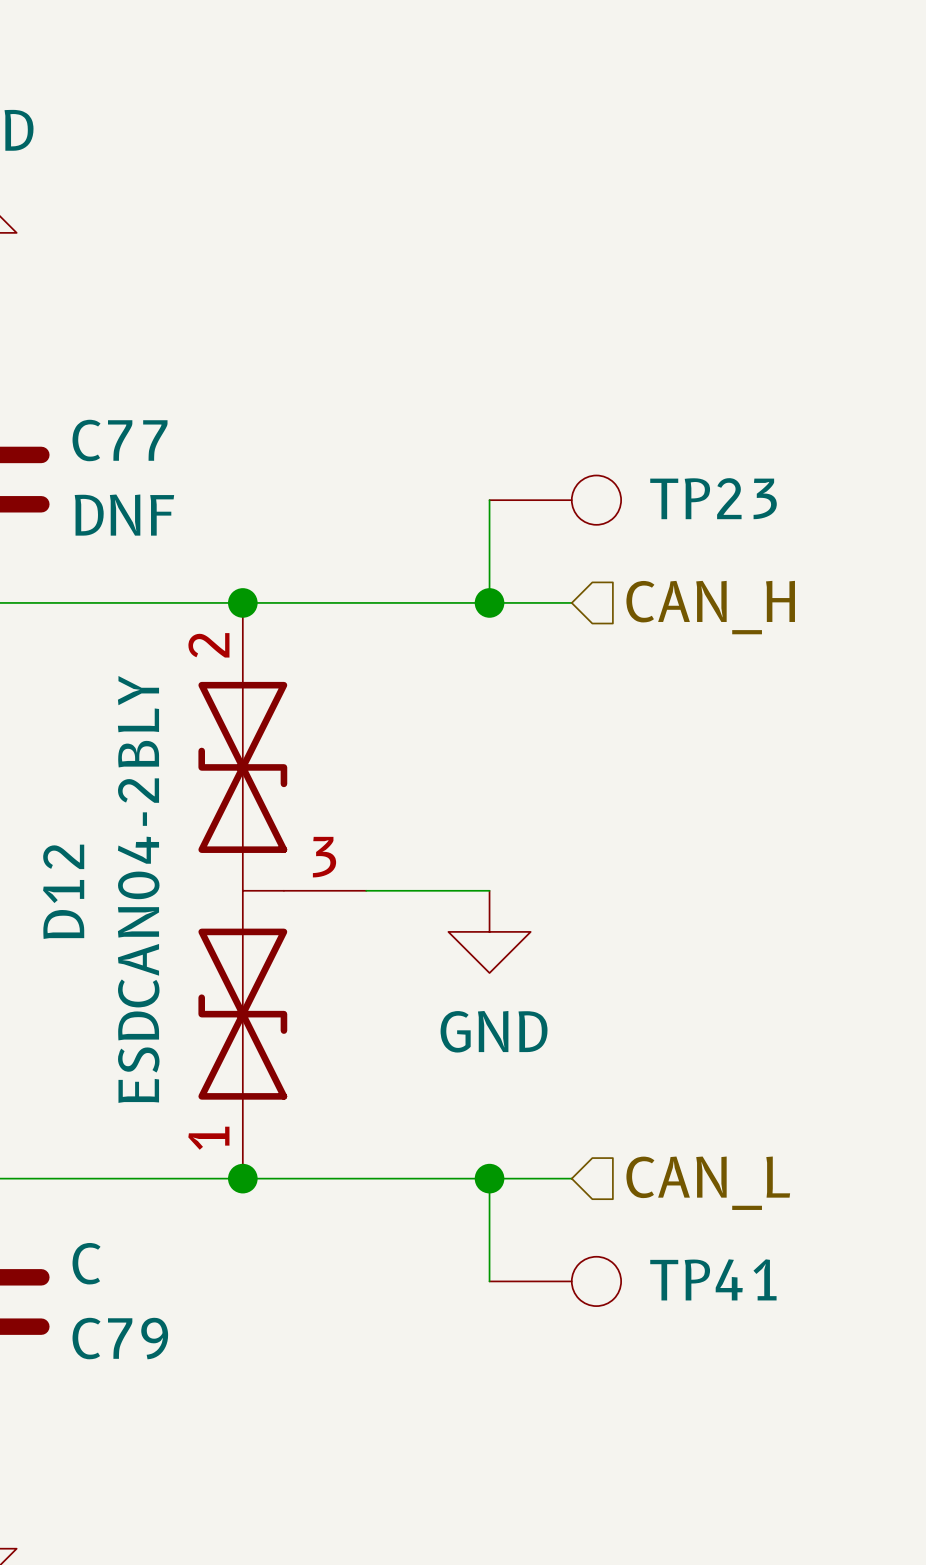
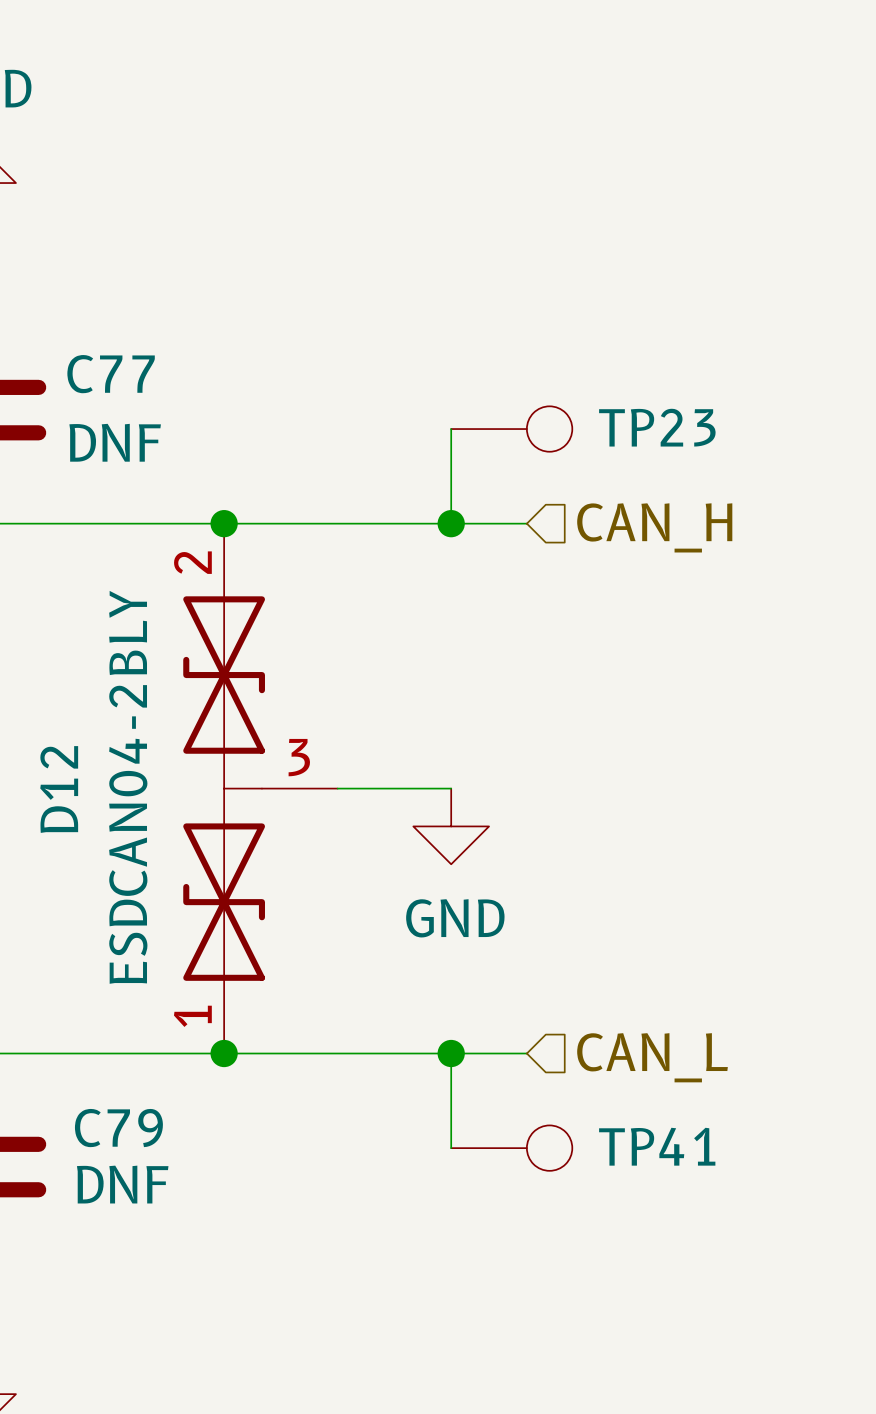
C79 value: C (86, 1263) -> DNF (122, 1184)
C79 name position: C79 (120, 1338) -> C79 (118, 1128)

